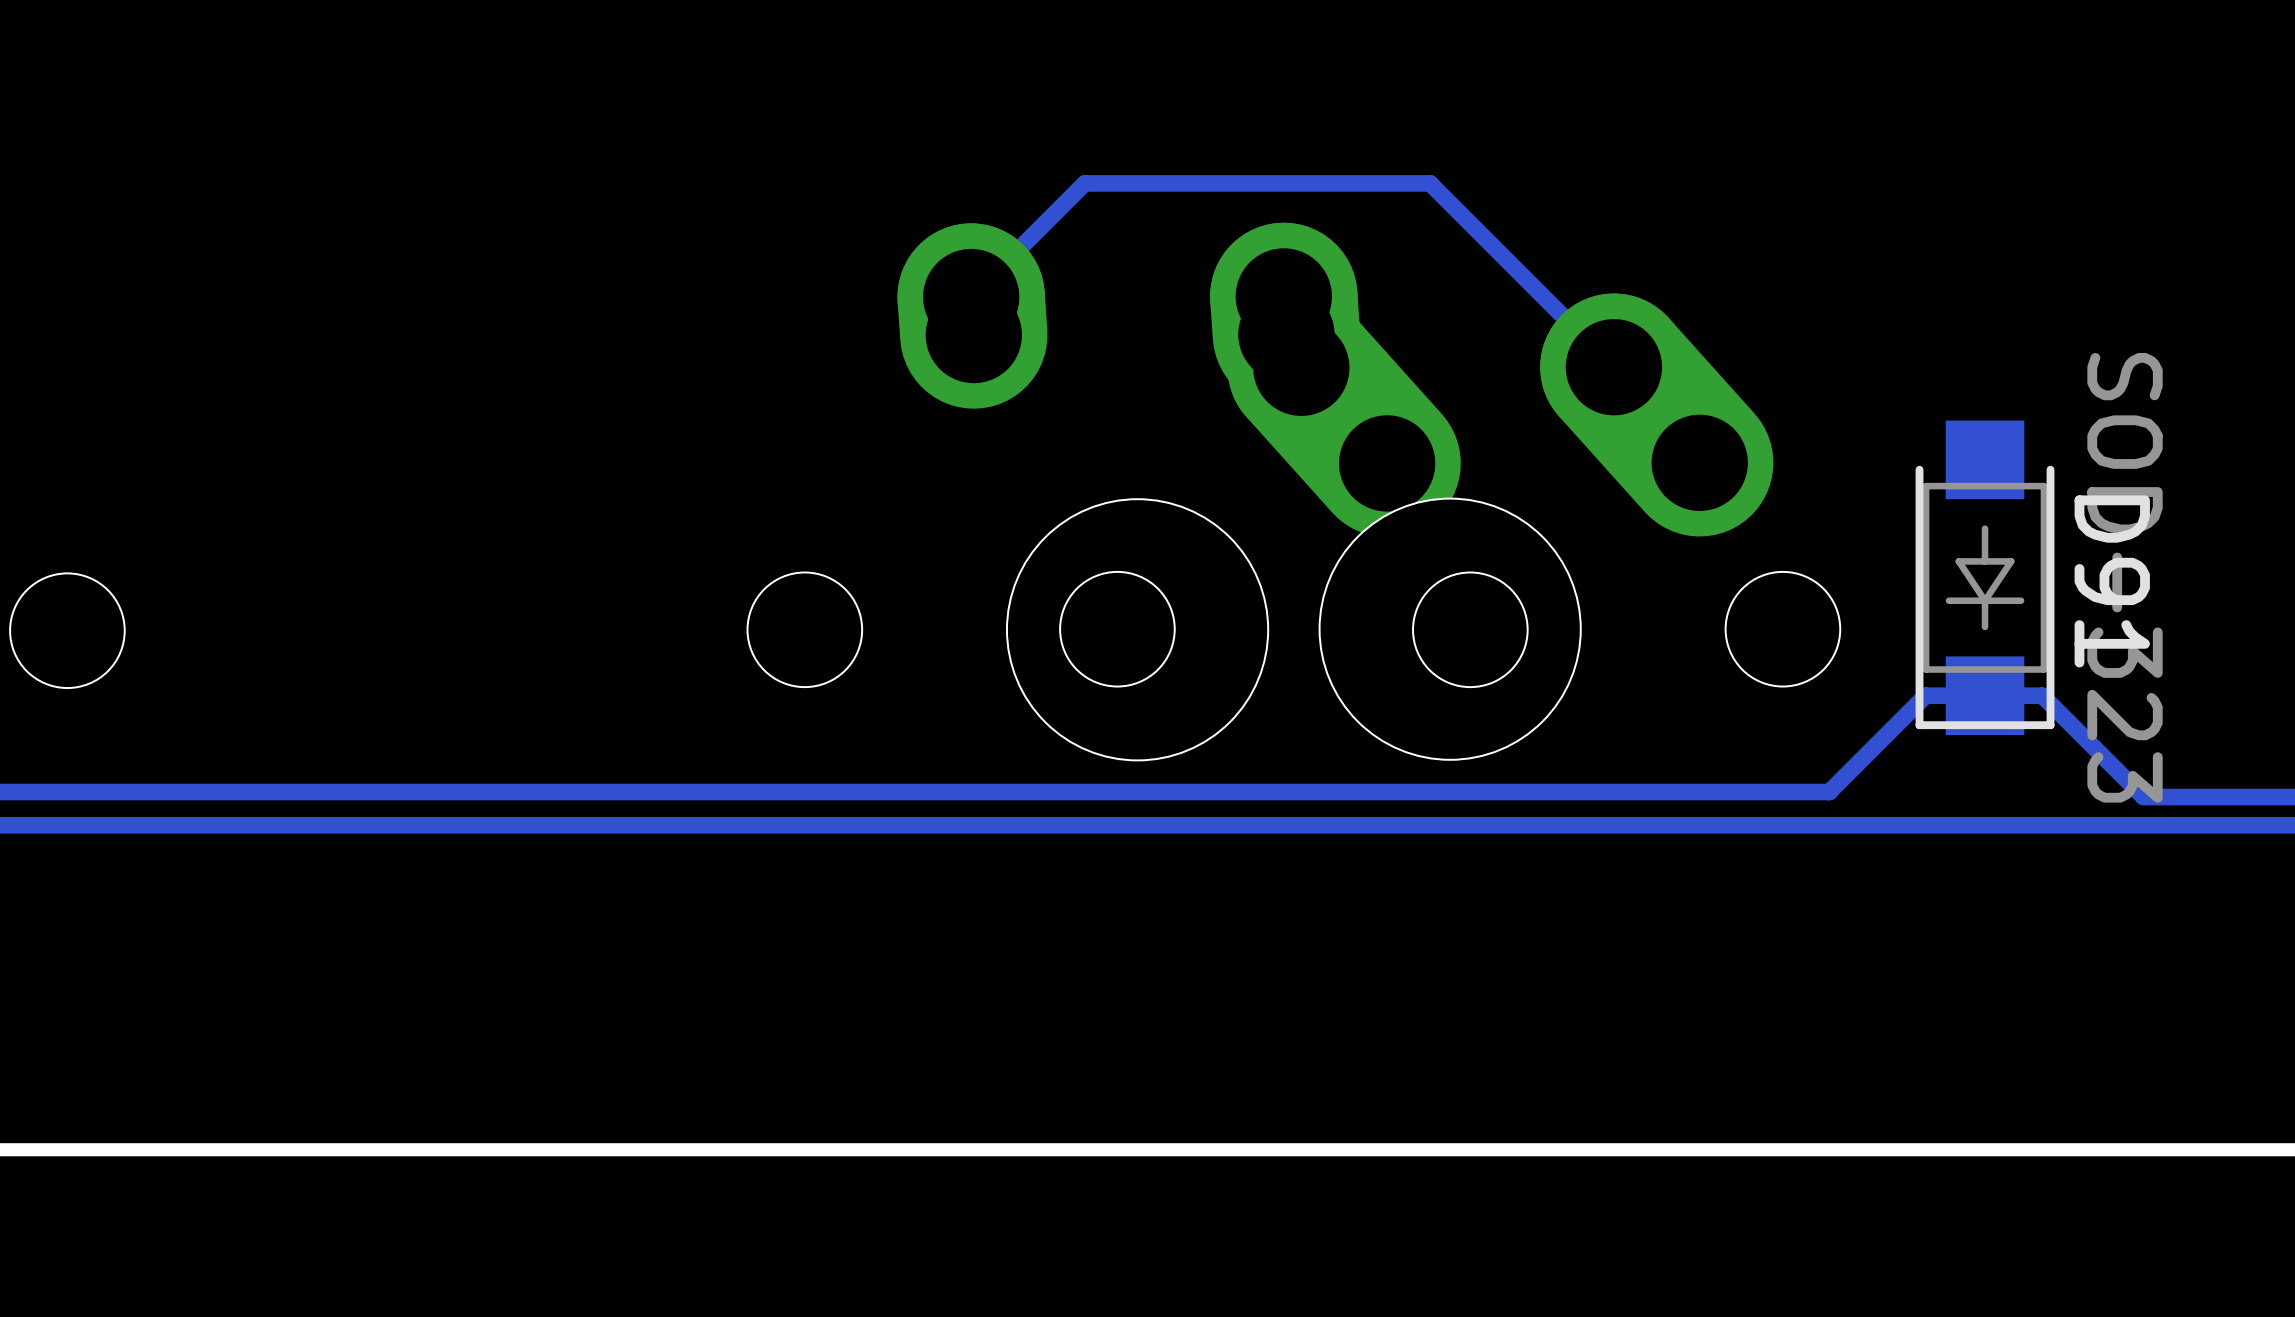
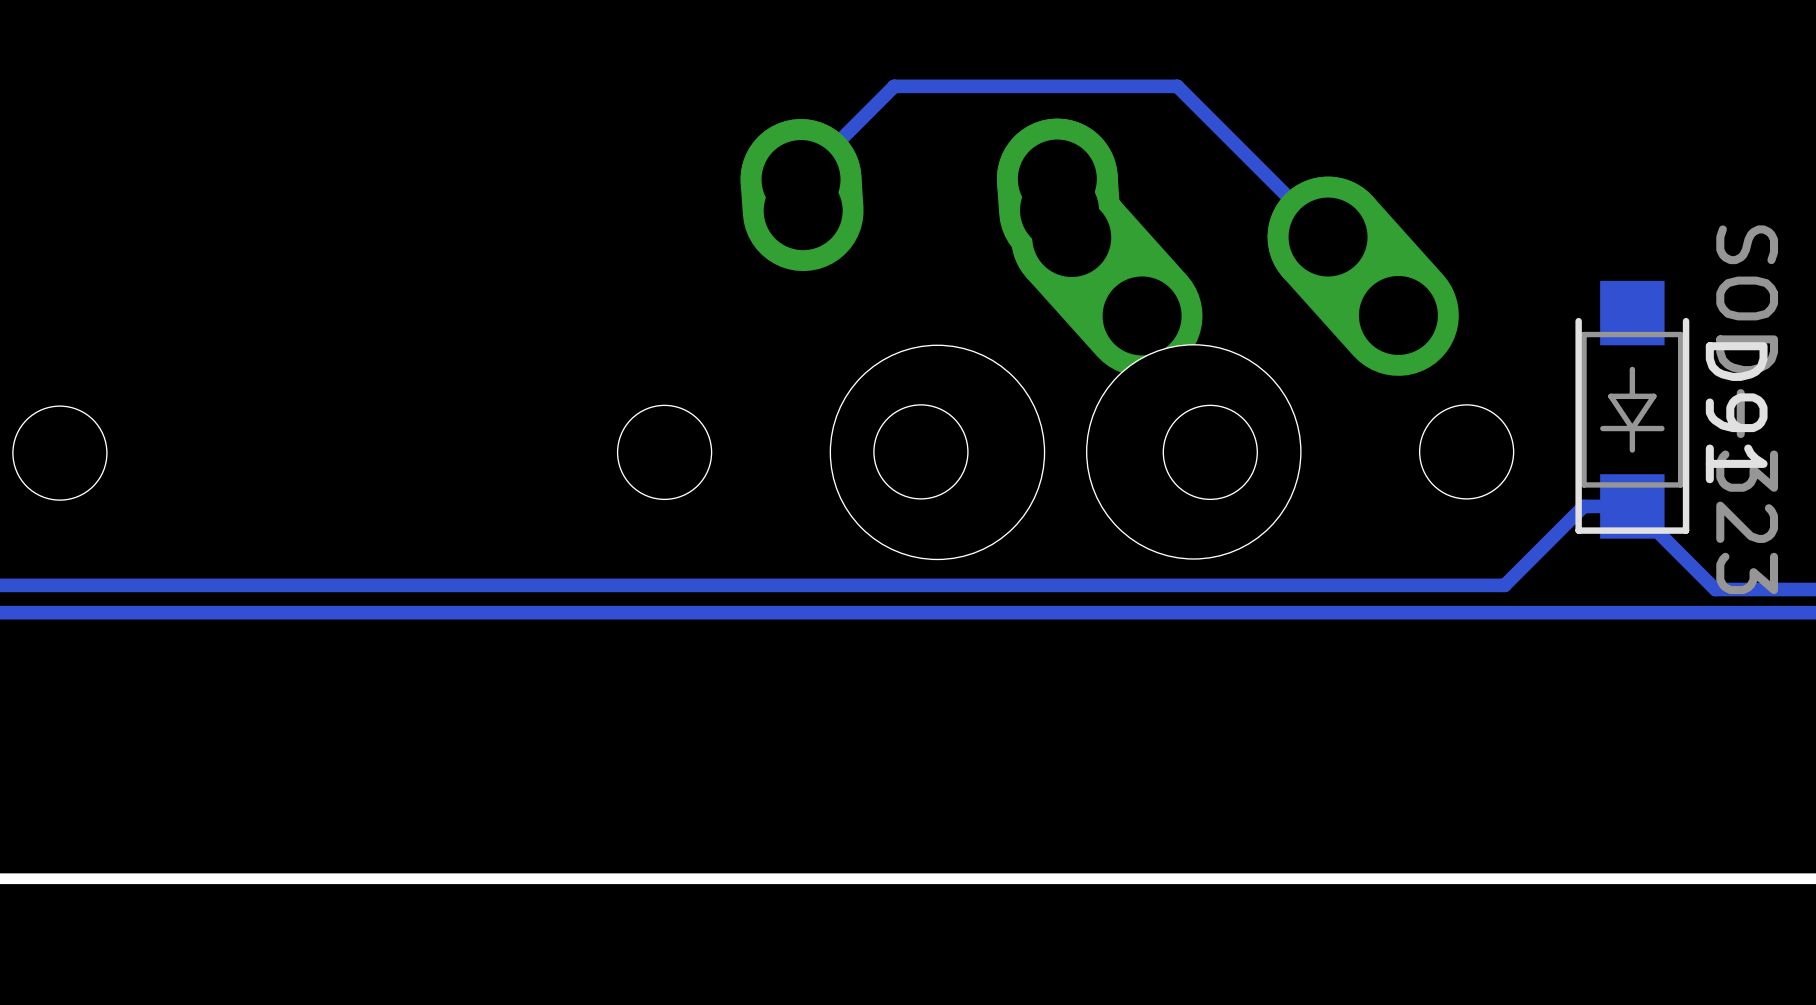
track: (1985, 695) (2042, 695) (2143, 797) -> (1632, 506) (1715, 589) (1762, 589)

